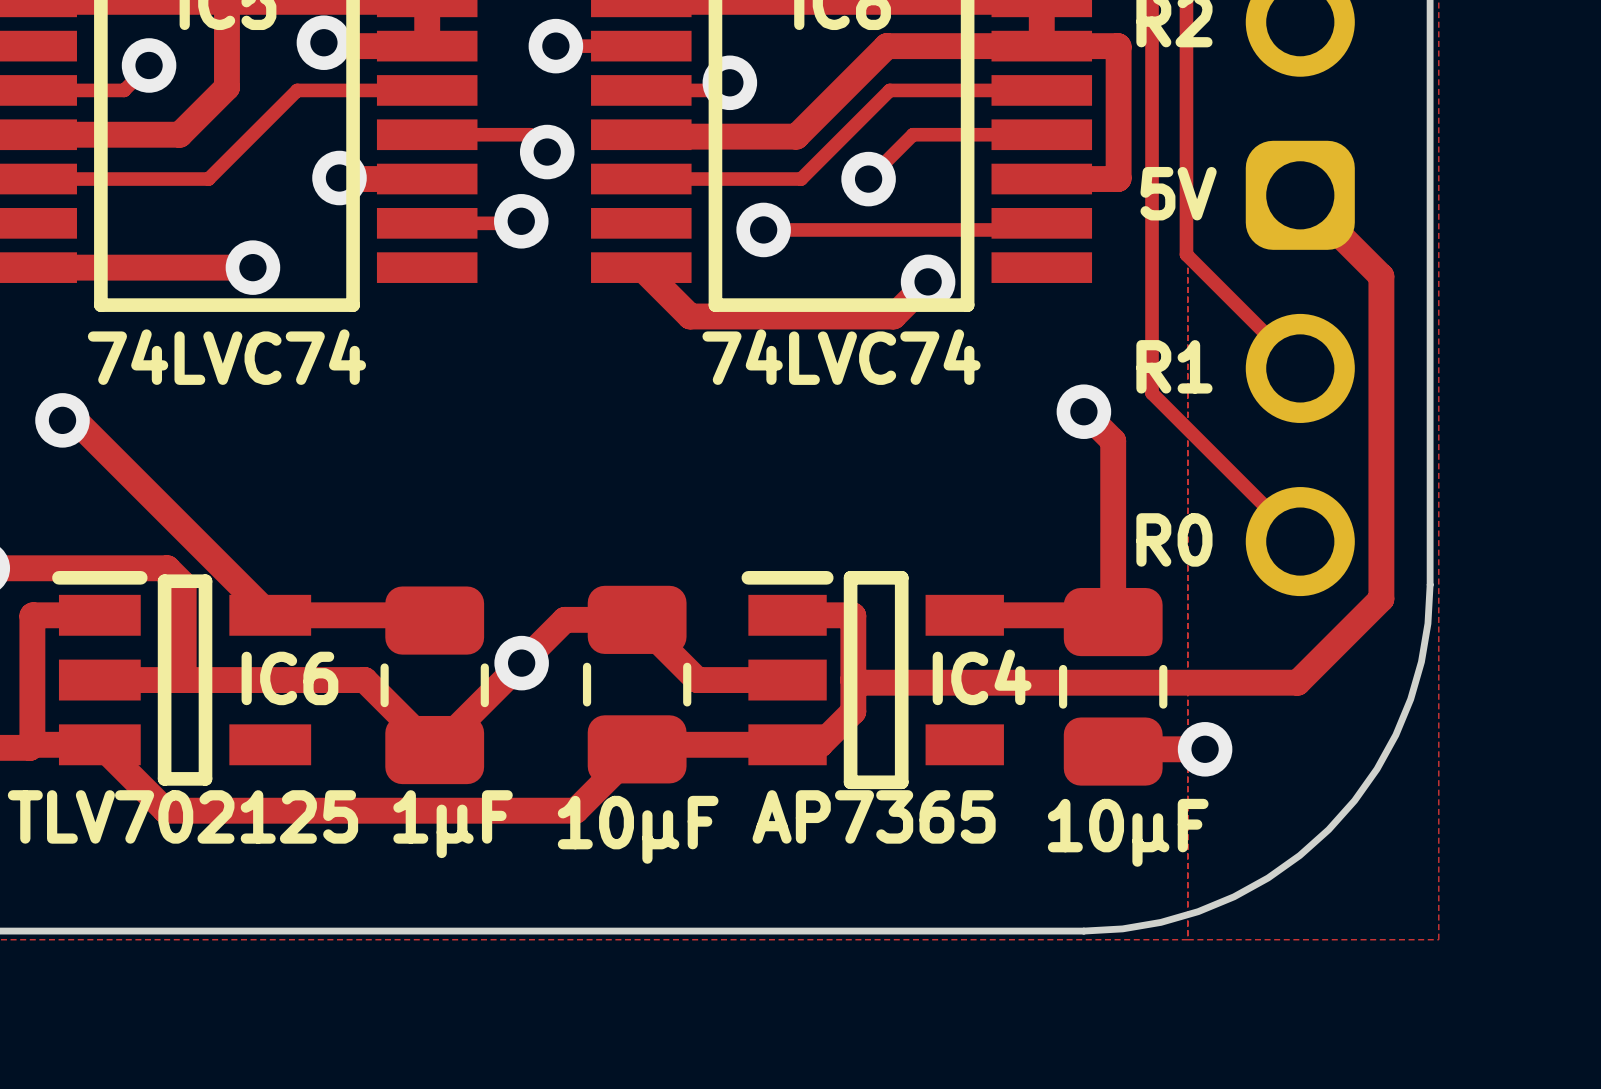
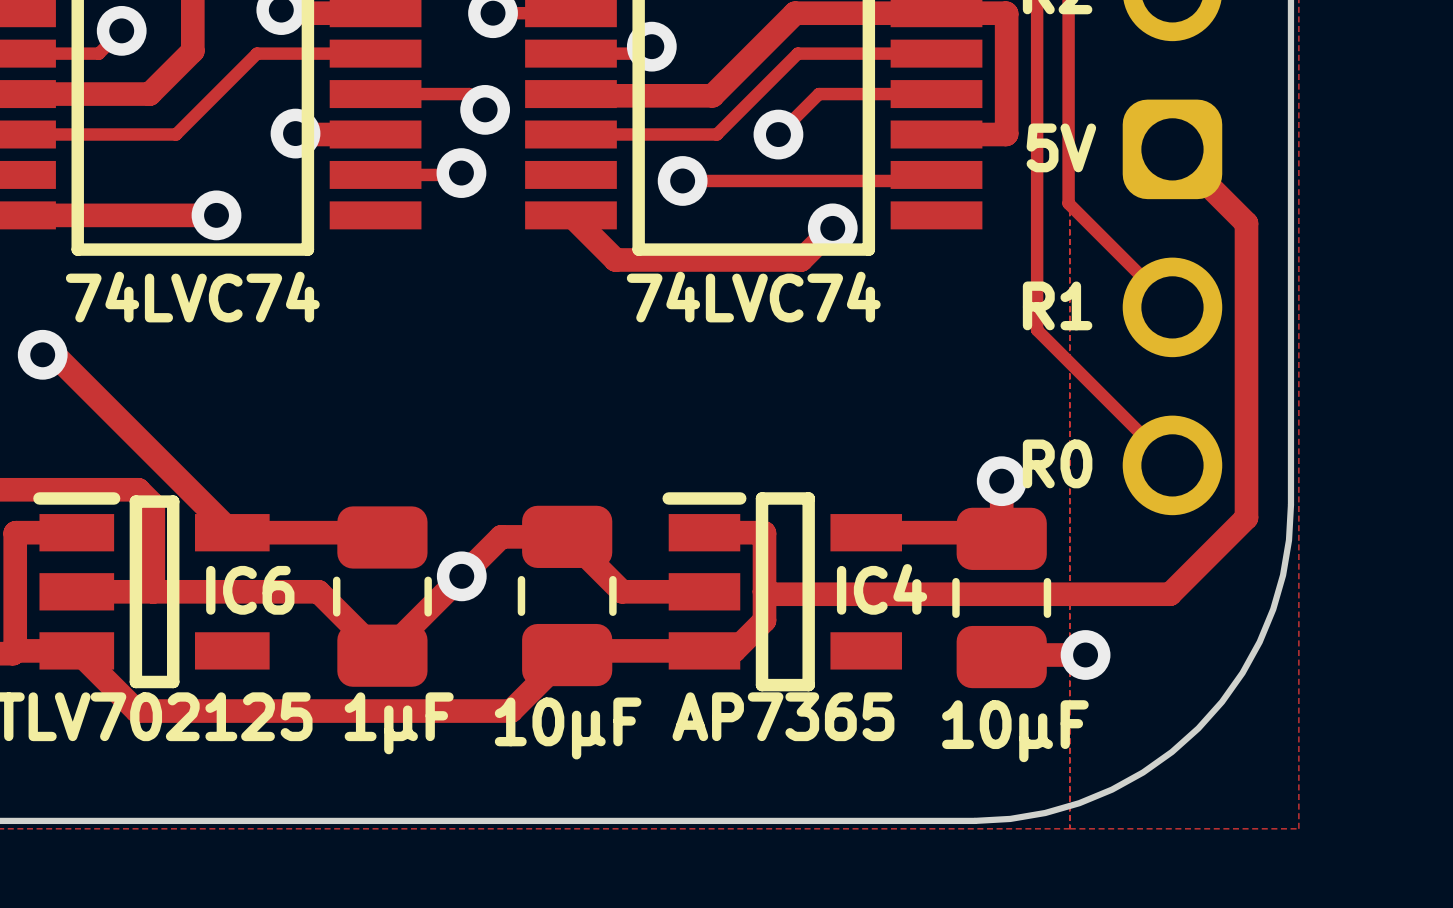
track: (1083, 411) (1113, 441) (1113, 558) -> none
via position: (1083, 411) -> (1001, 481)

